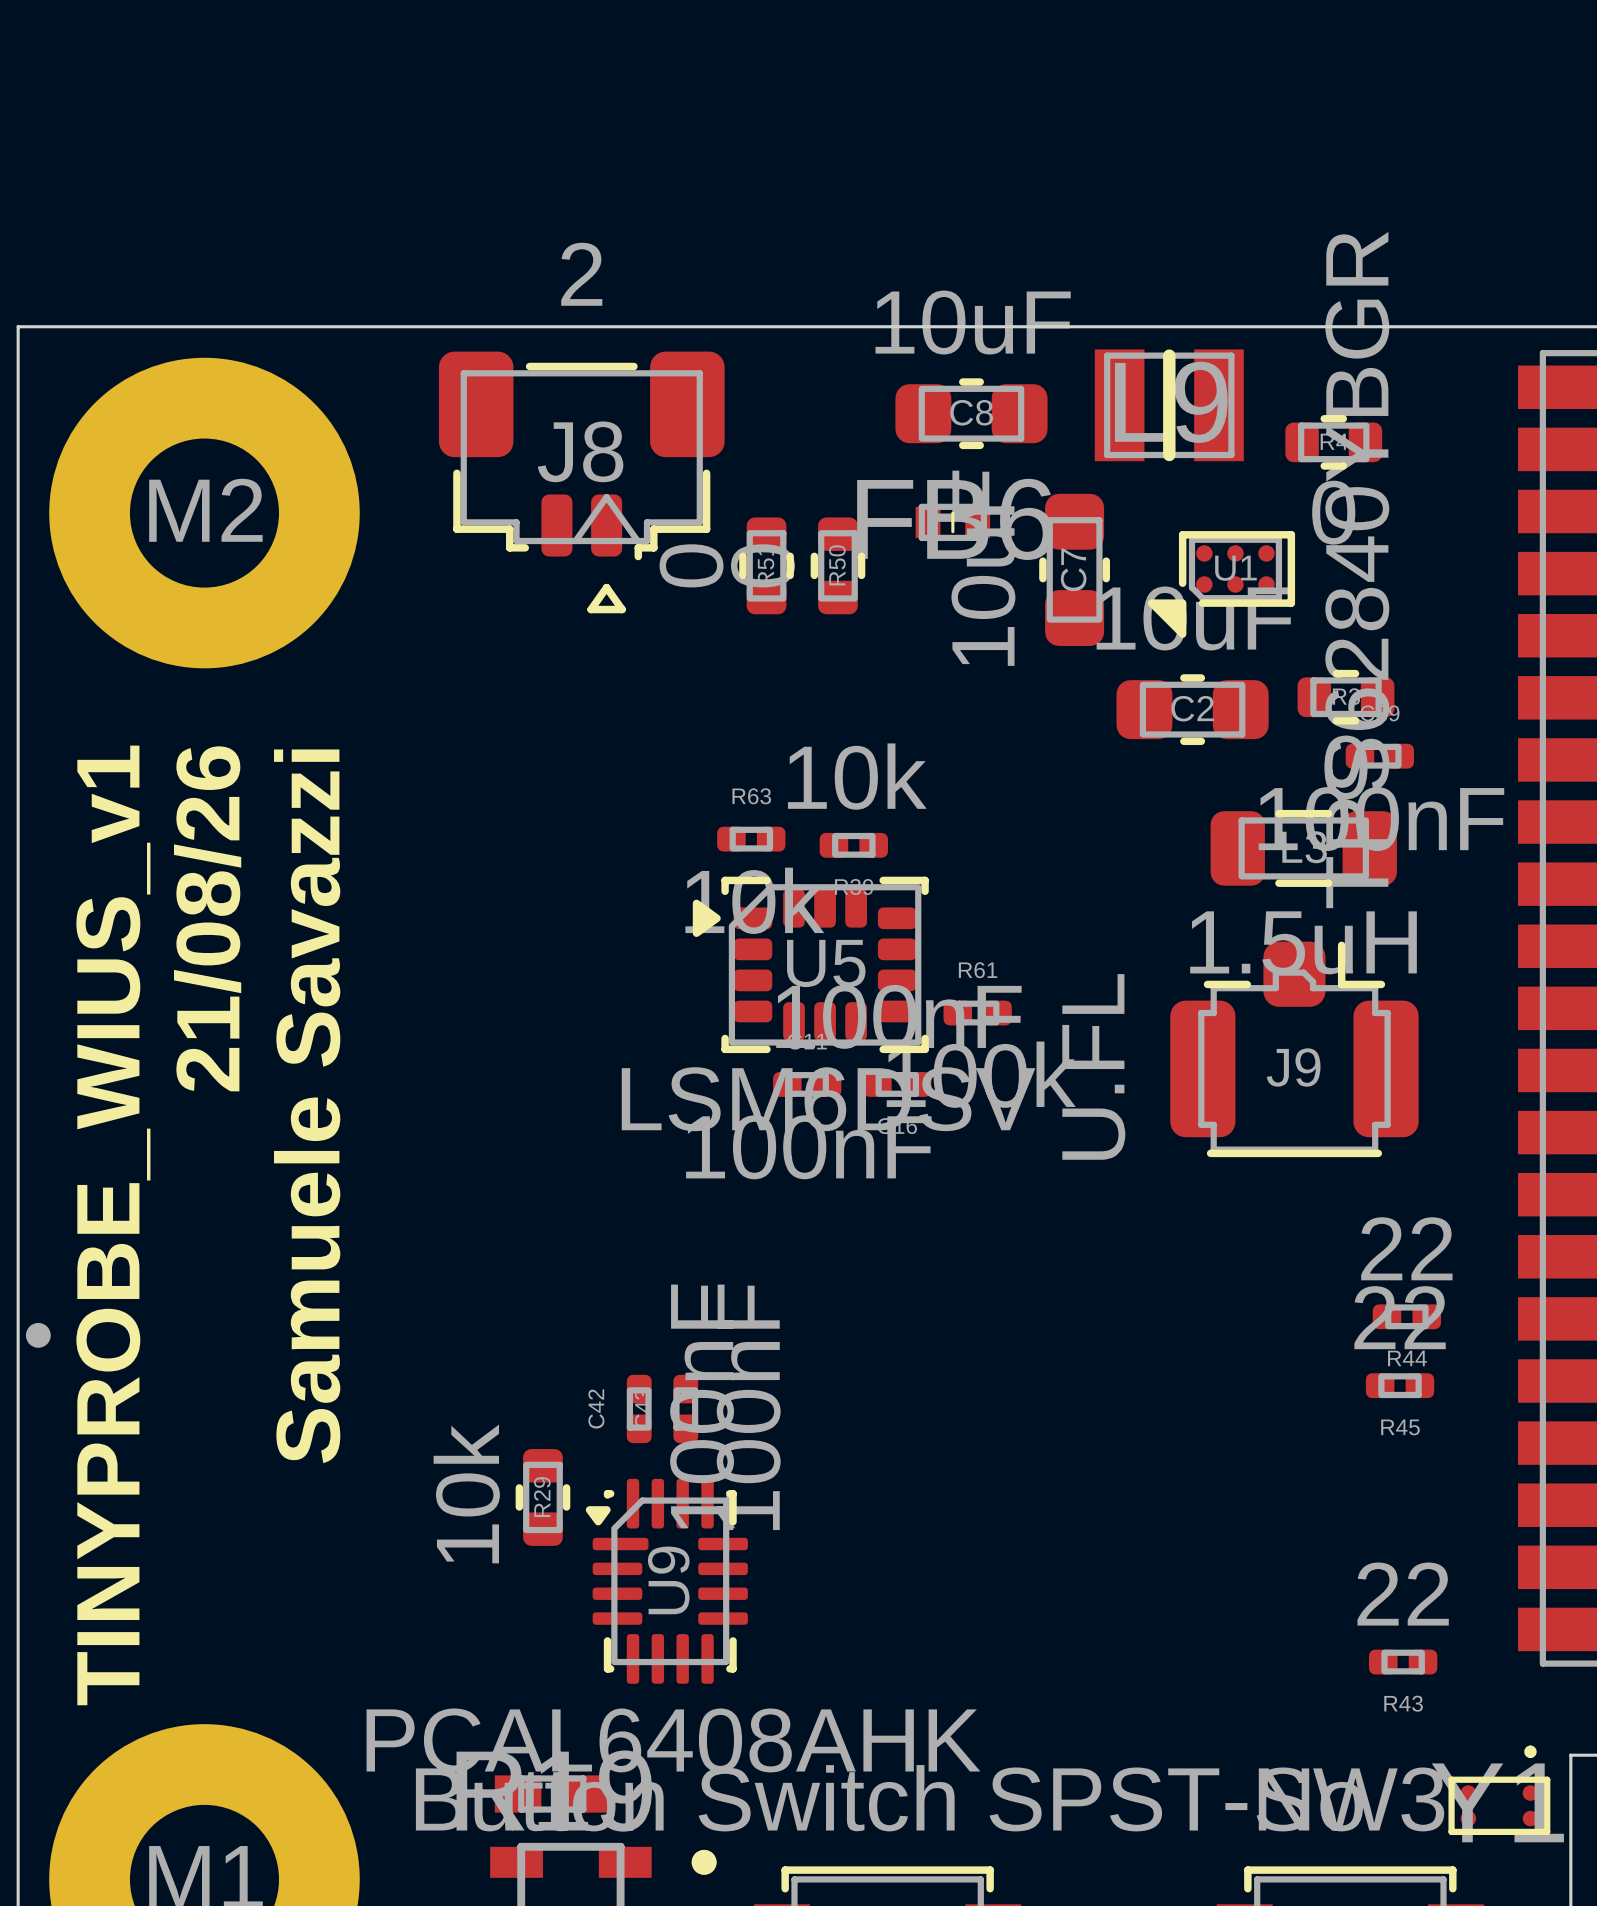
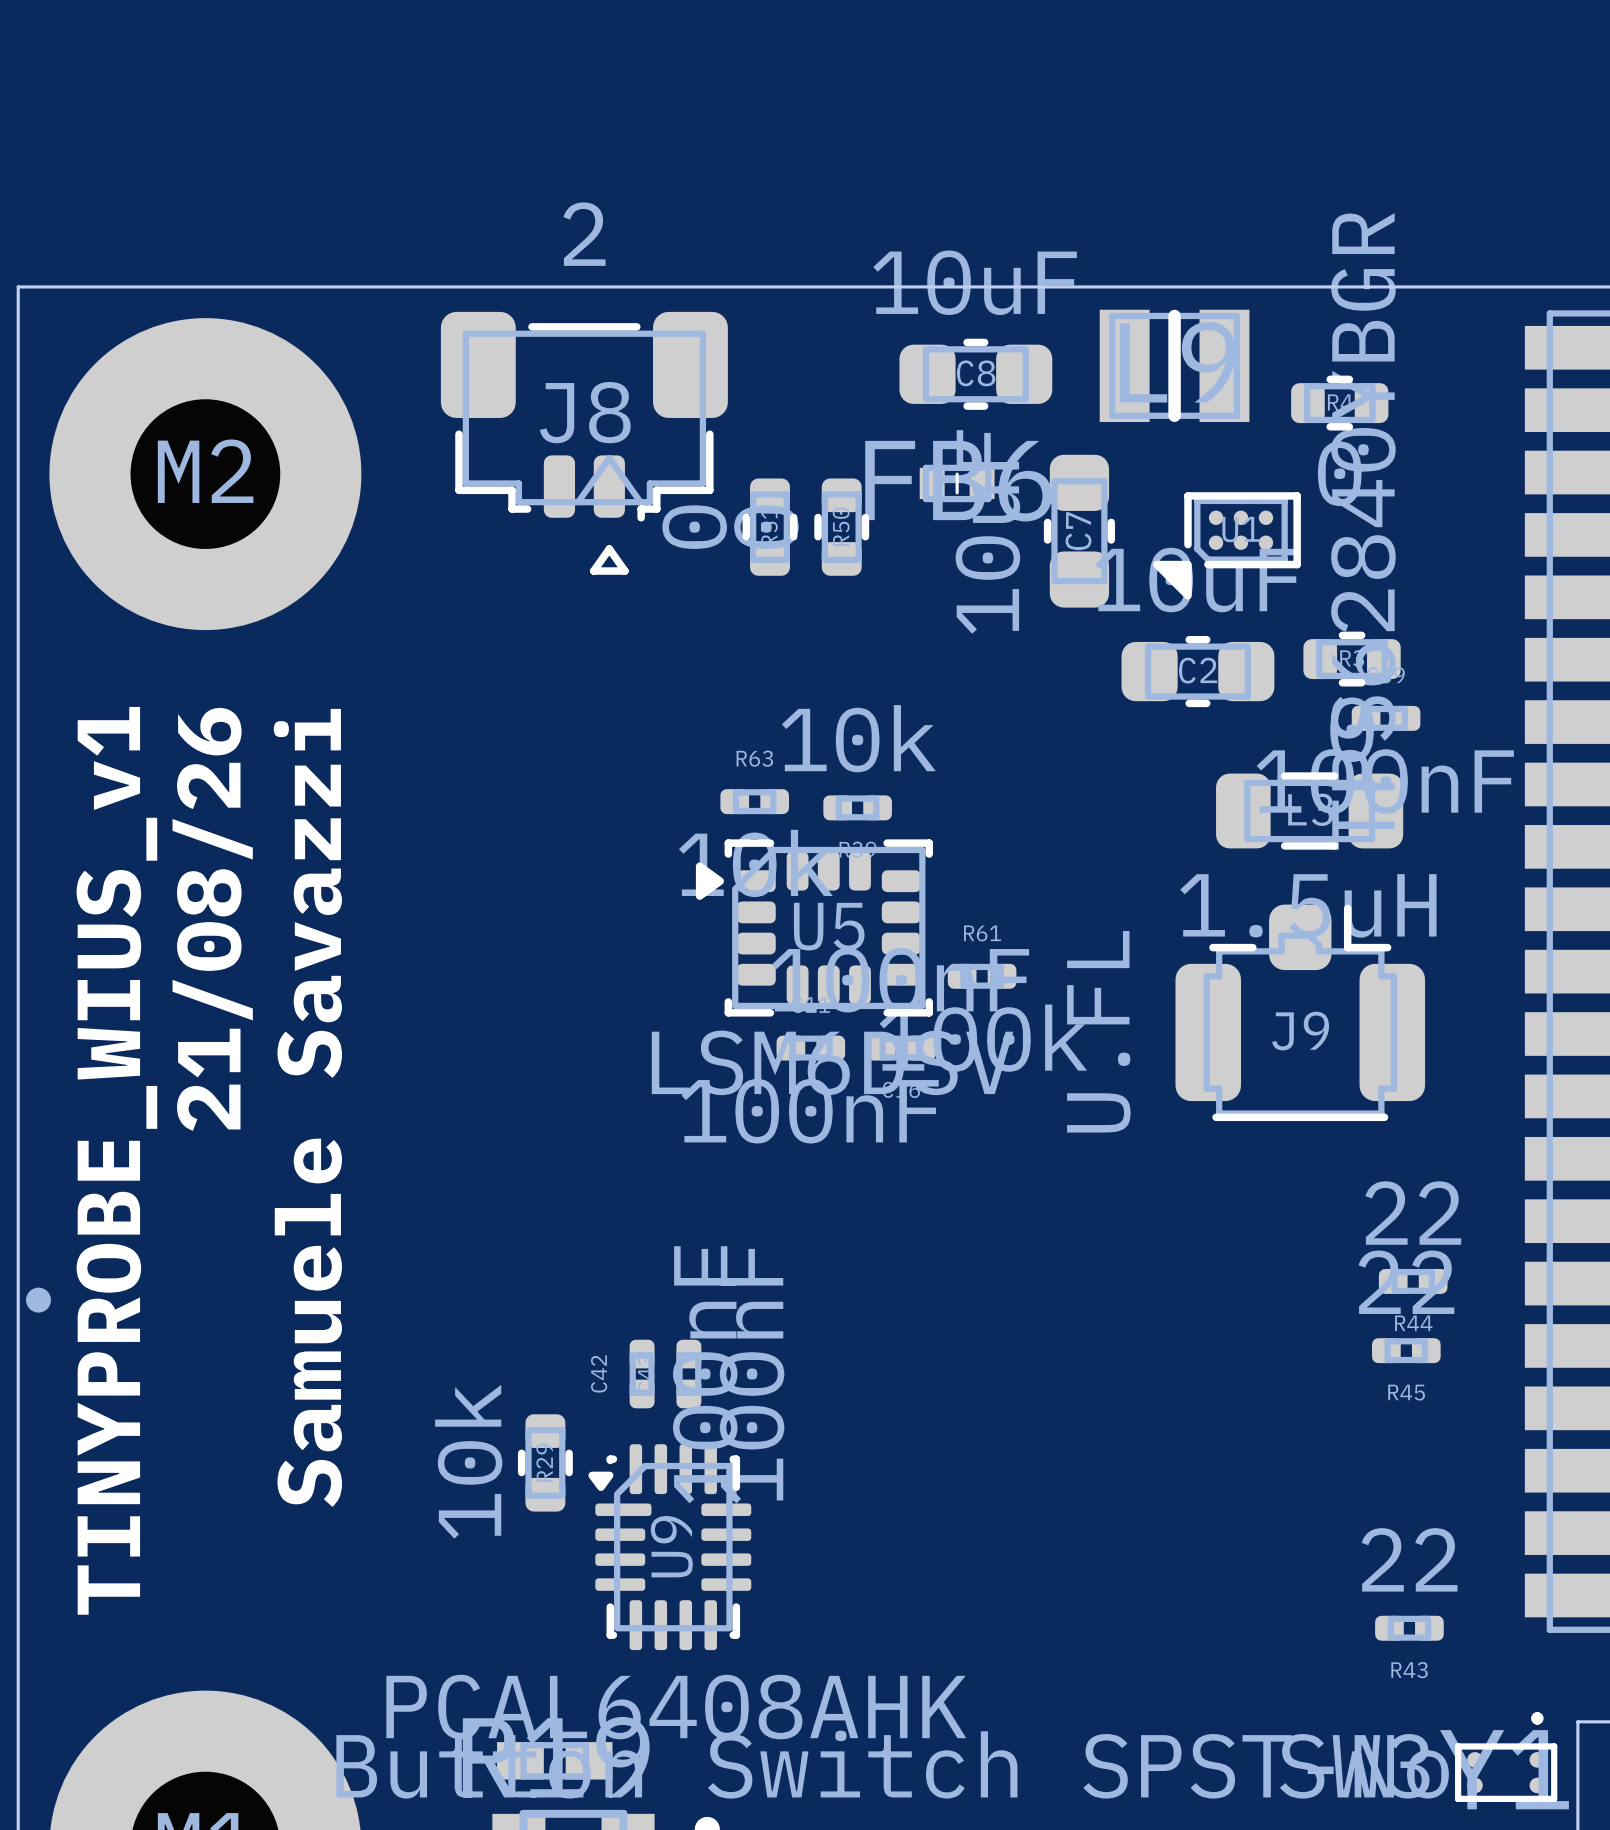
U1 footprint: [1147, 531, 1296, 638] -> [1153, 492, 1301, 600]

